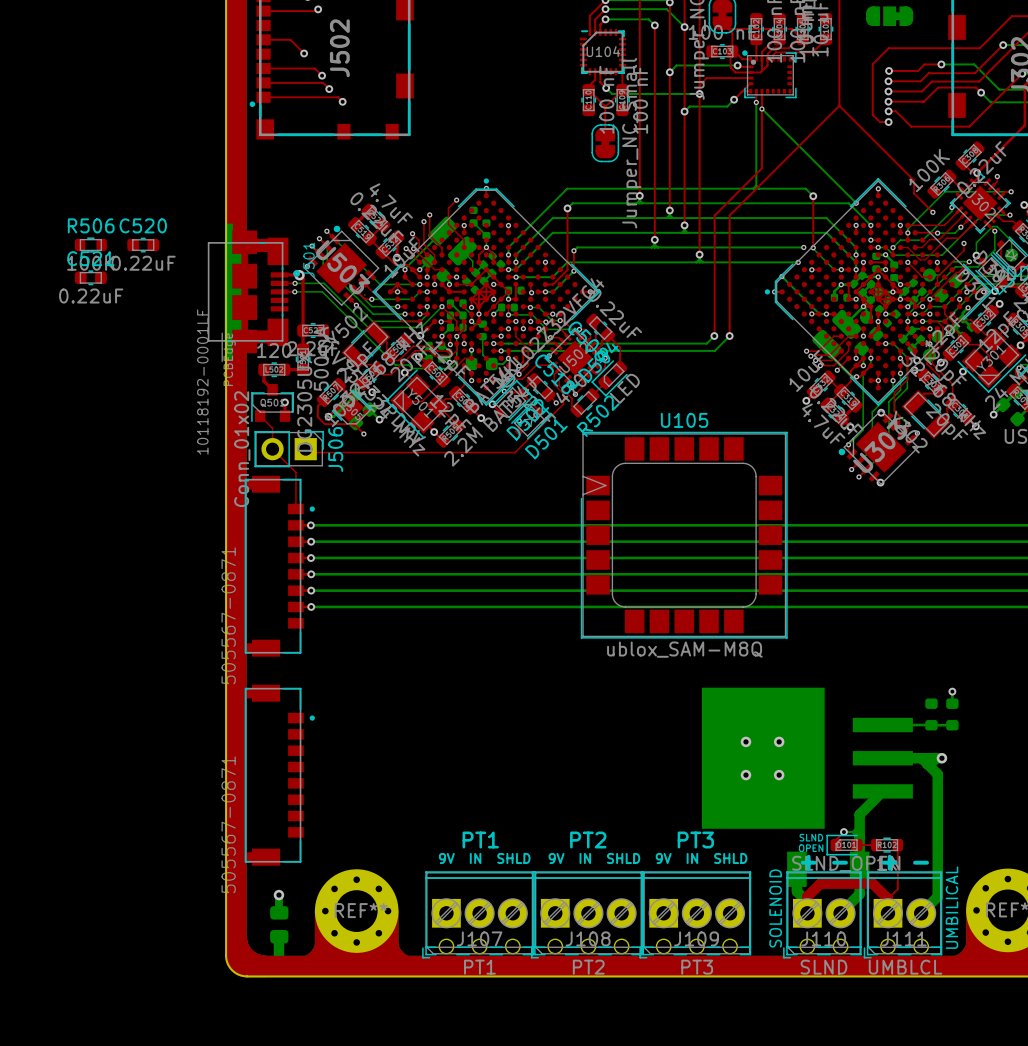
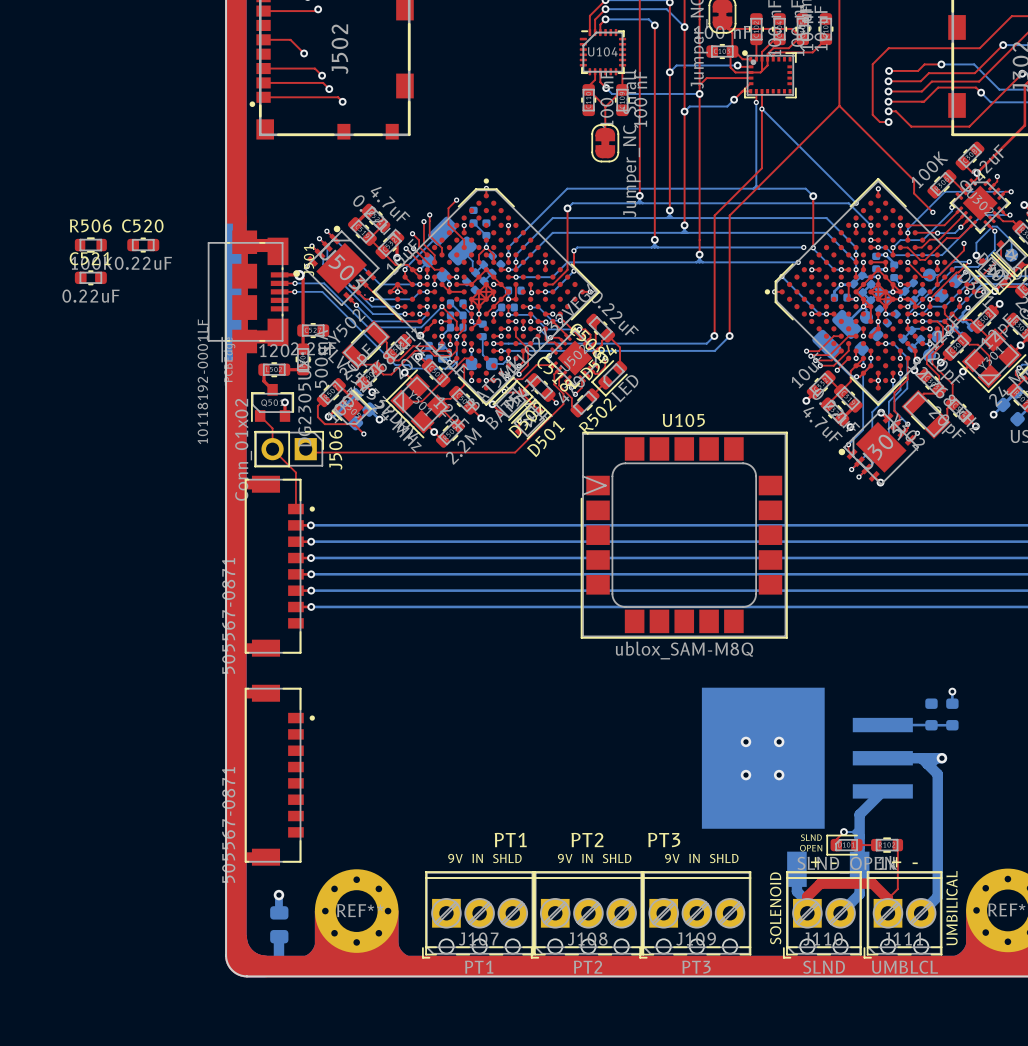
part: (889, 16) -> none

